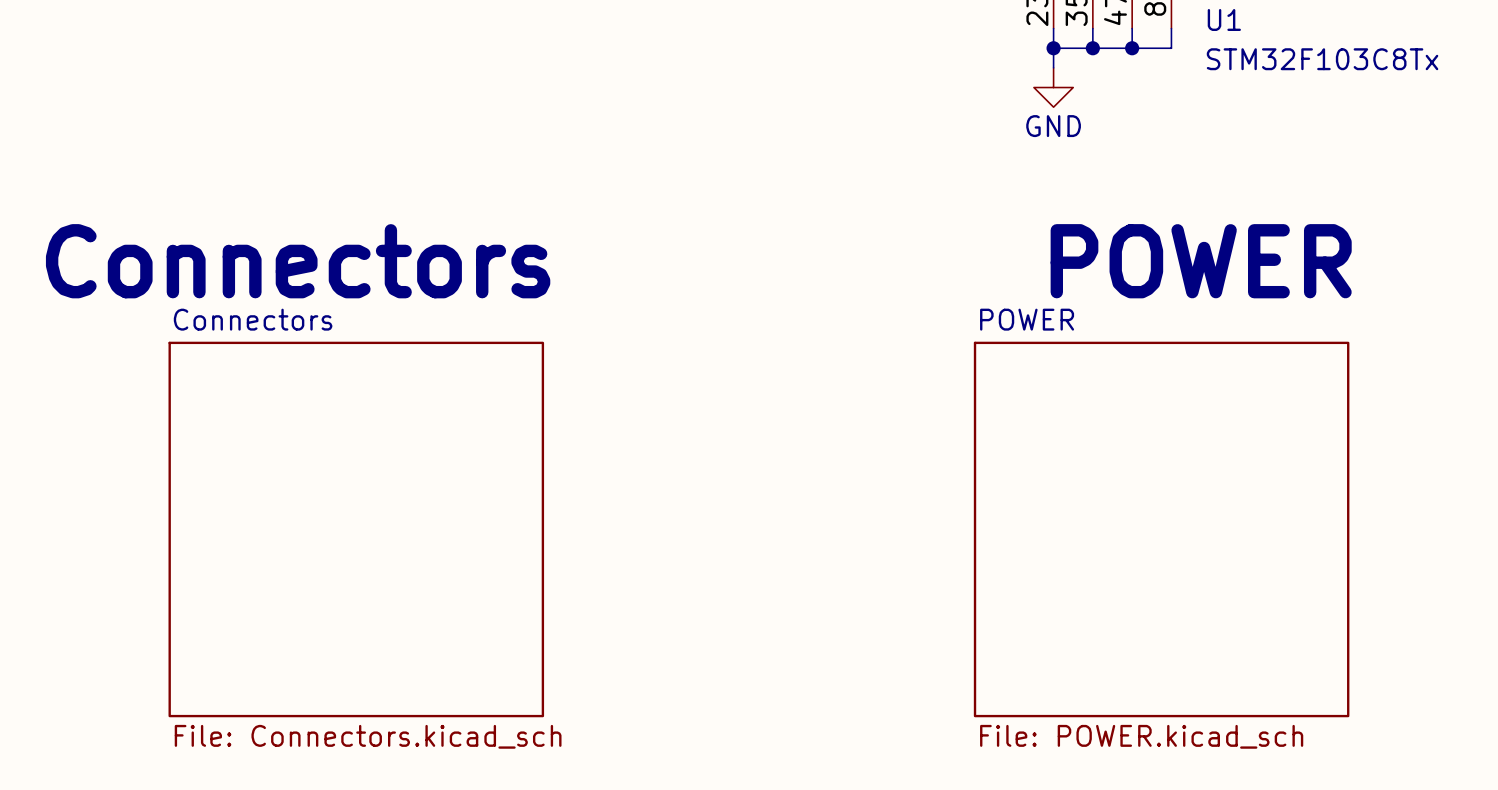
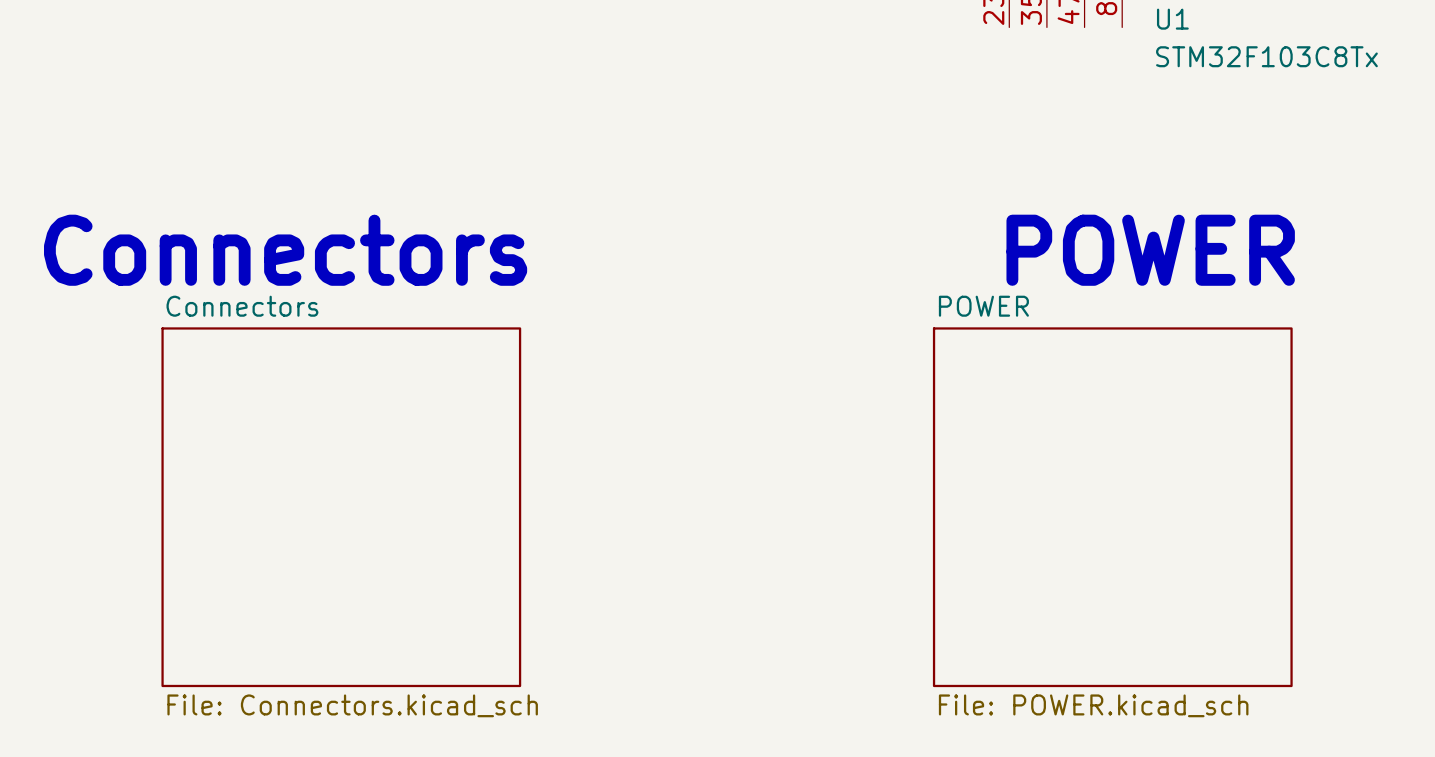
wire: (1053, 28) (1053, 67) -> none
wire: (1092, 28) (1092, 48) -> none
wire: (1132, 28) (1132, 48) -> none
wire: (1171, 28) (1171, 48) (1053, 48) -> none
junction: (1053, 48) -> none
junction: (1092, 48) -> none
junction: (1132, 48) -> none
power symbol: GND (1053, 87) -> none

